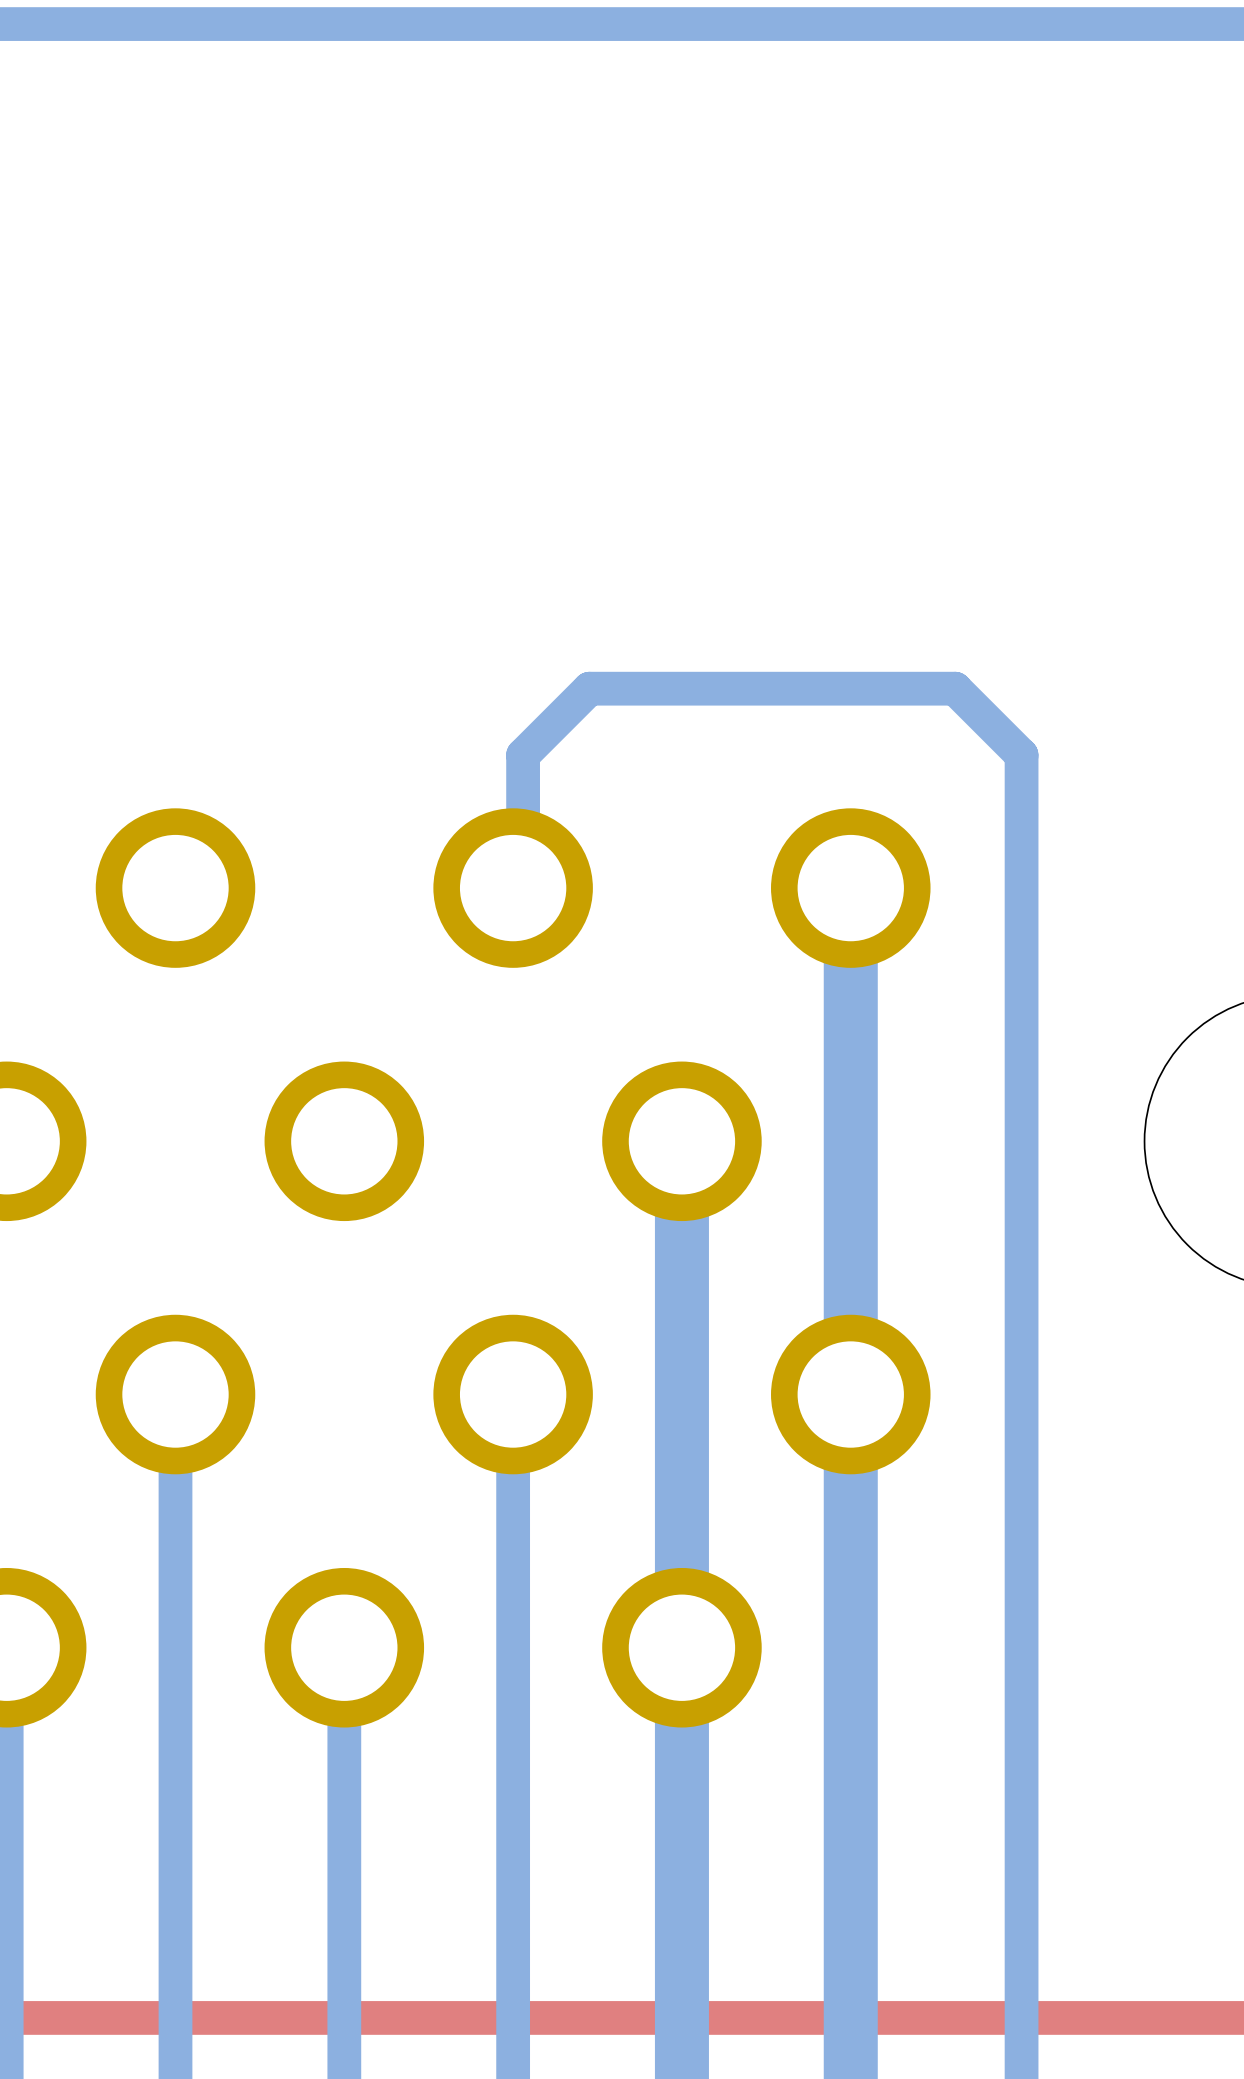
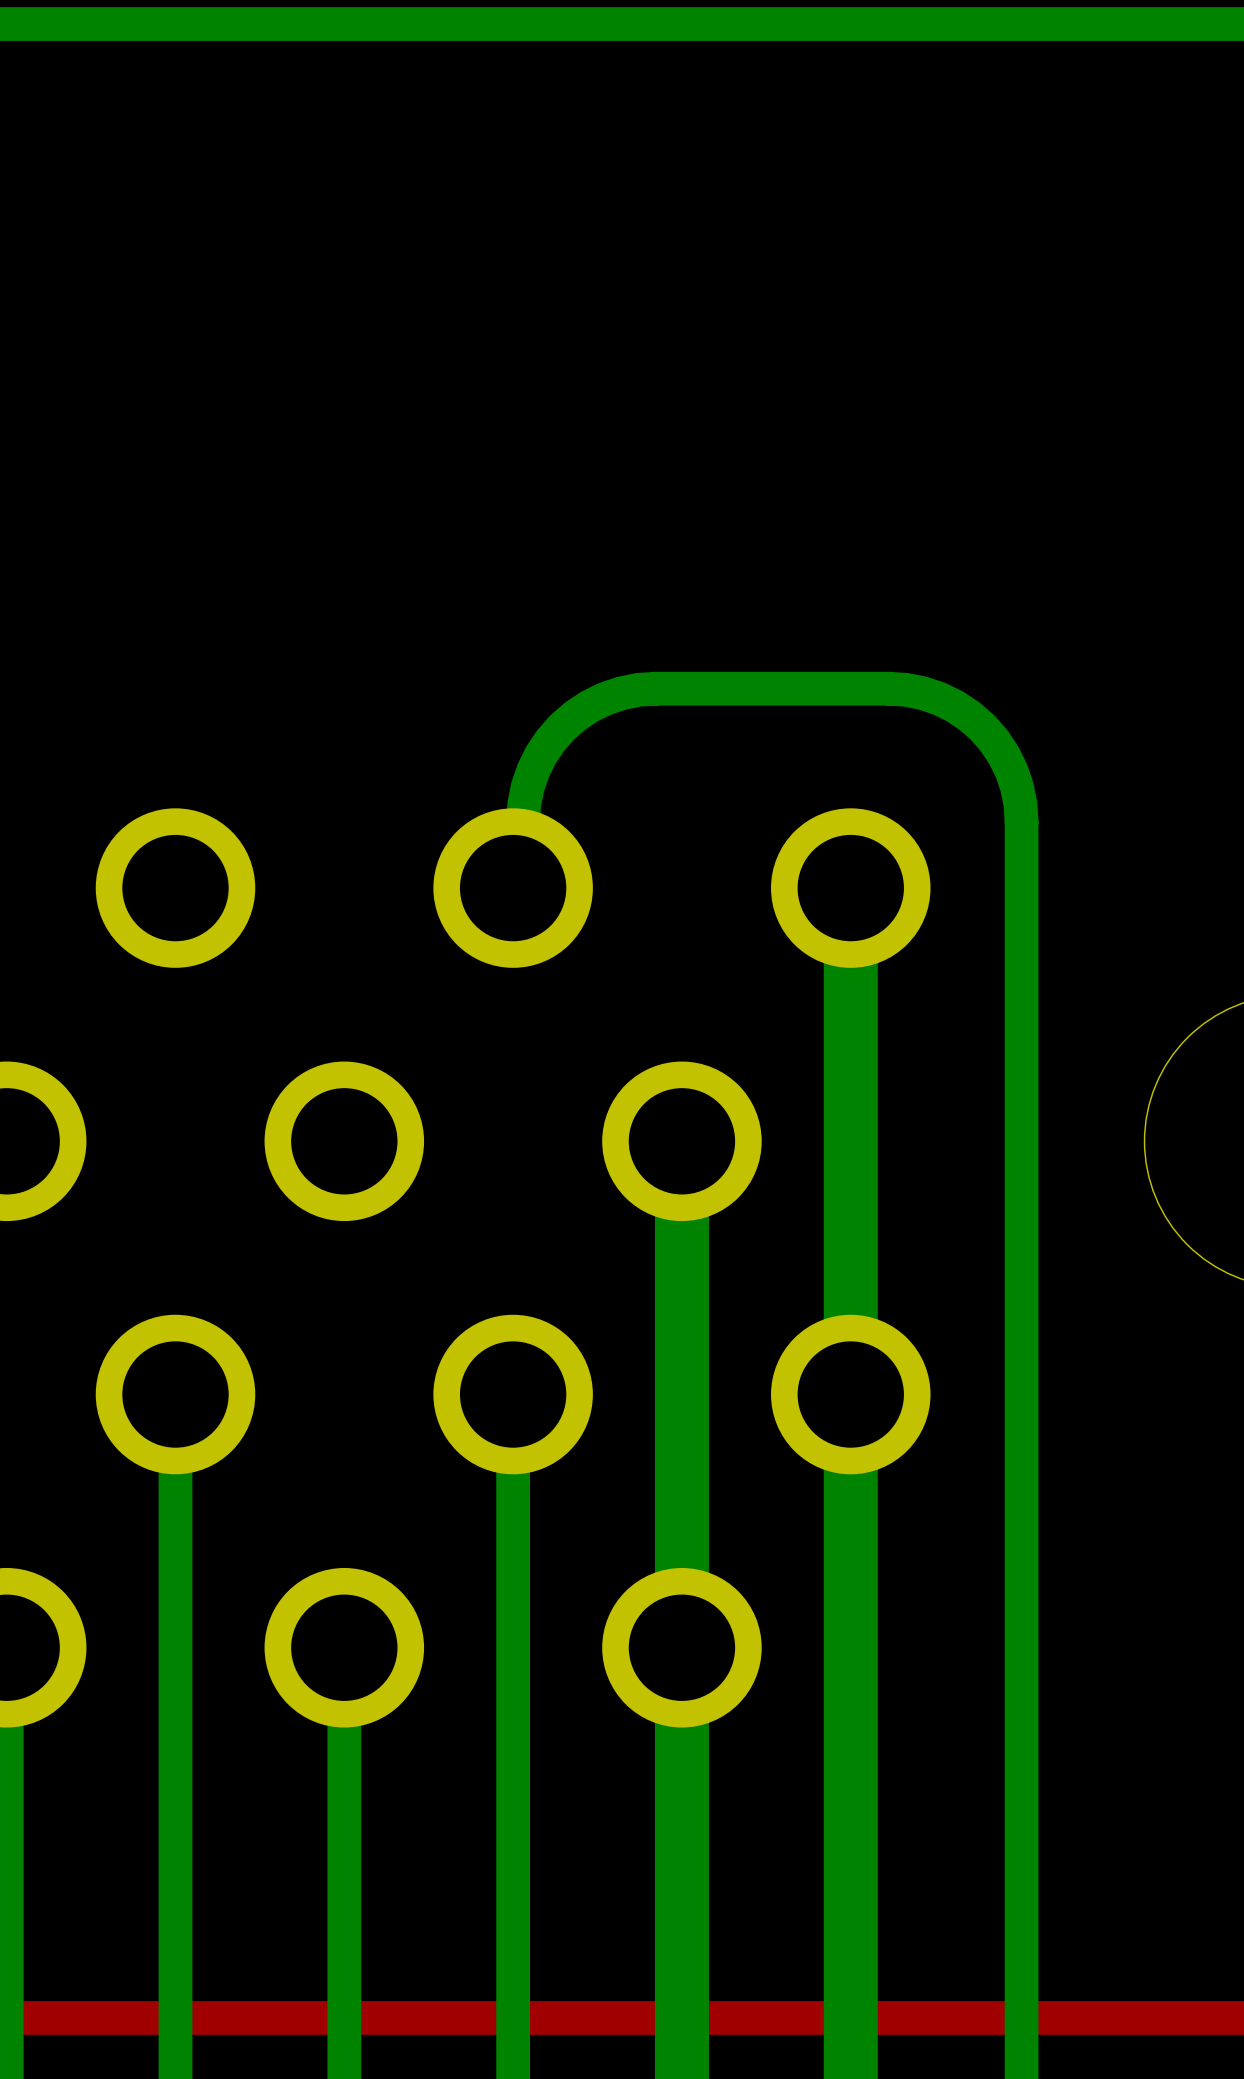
bottom track: (656, 688) (589, 688) (523, 755) (523, 821) -> (656, 688) (621, 693) (605, 698) (589, 706) (562, 727) (540, 755) (533, 770) (527, 787) (523, 821)
bottom track: (888, 688) (955, 688) (1021, 755) (1021, 821) -> (888, 688) (923, 693) (939, 698) (955, 706) (982, 727) (1003, 755) (1011, 770) (1017, 787) (1021, 821)

